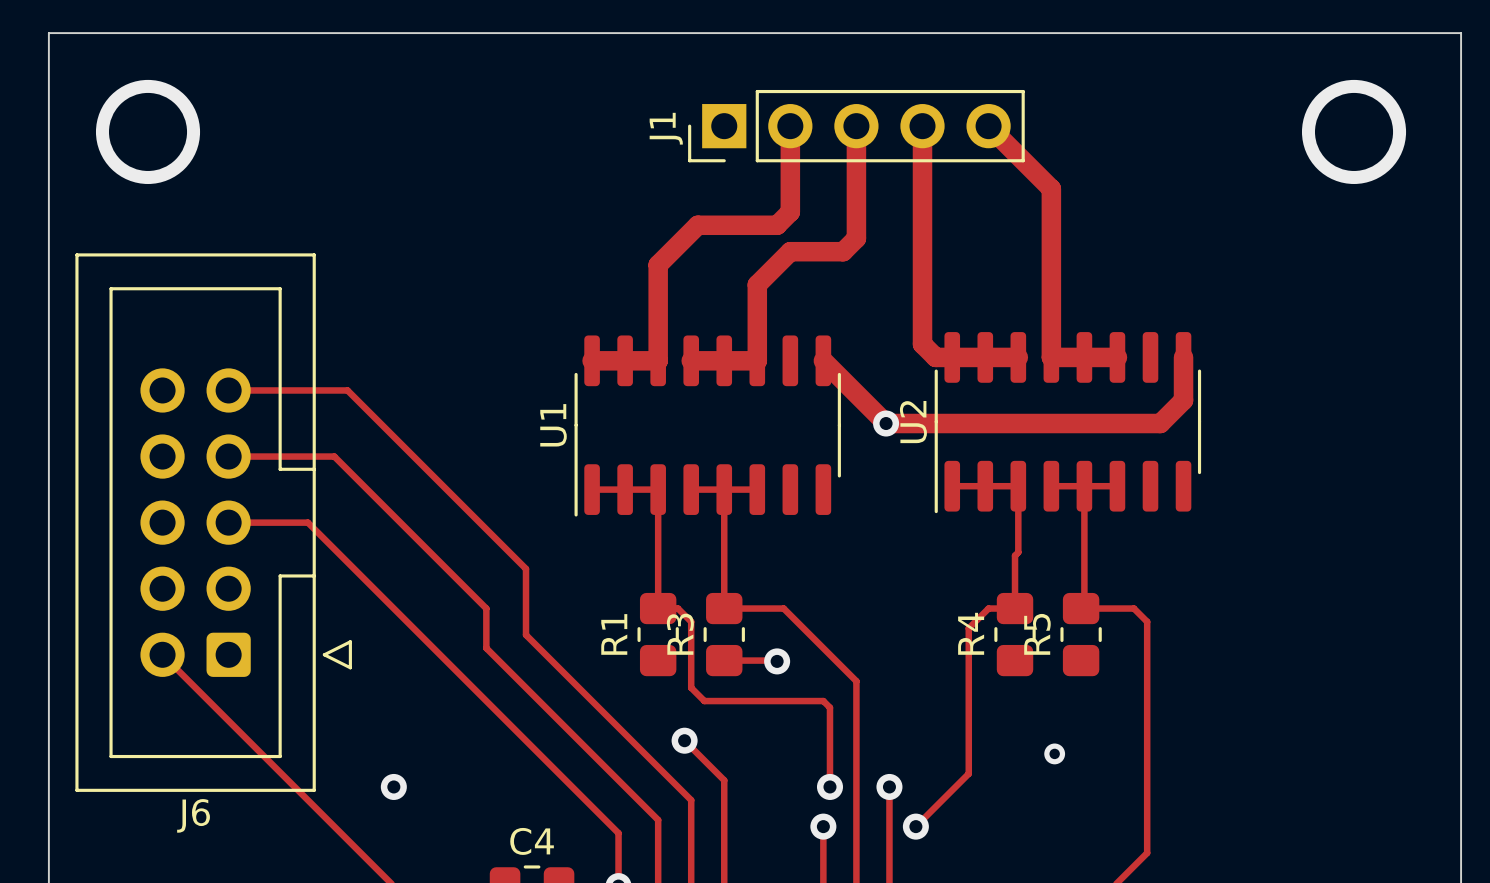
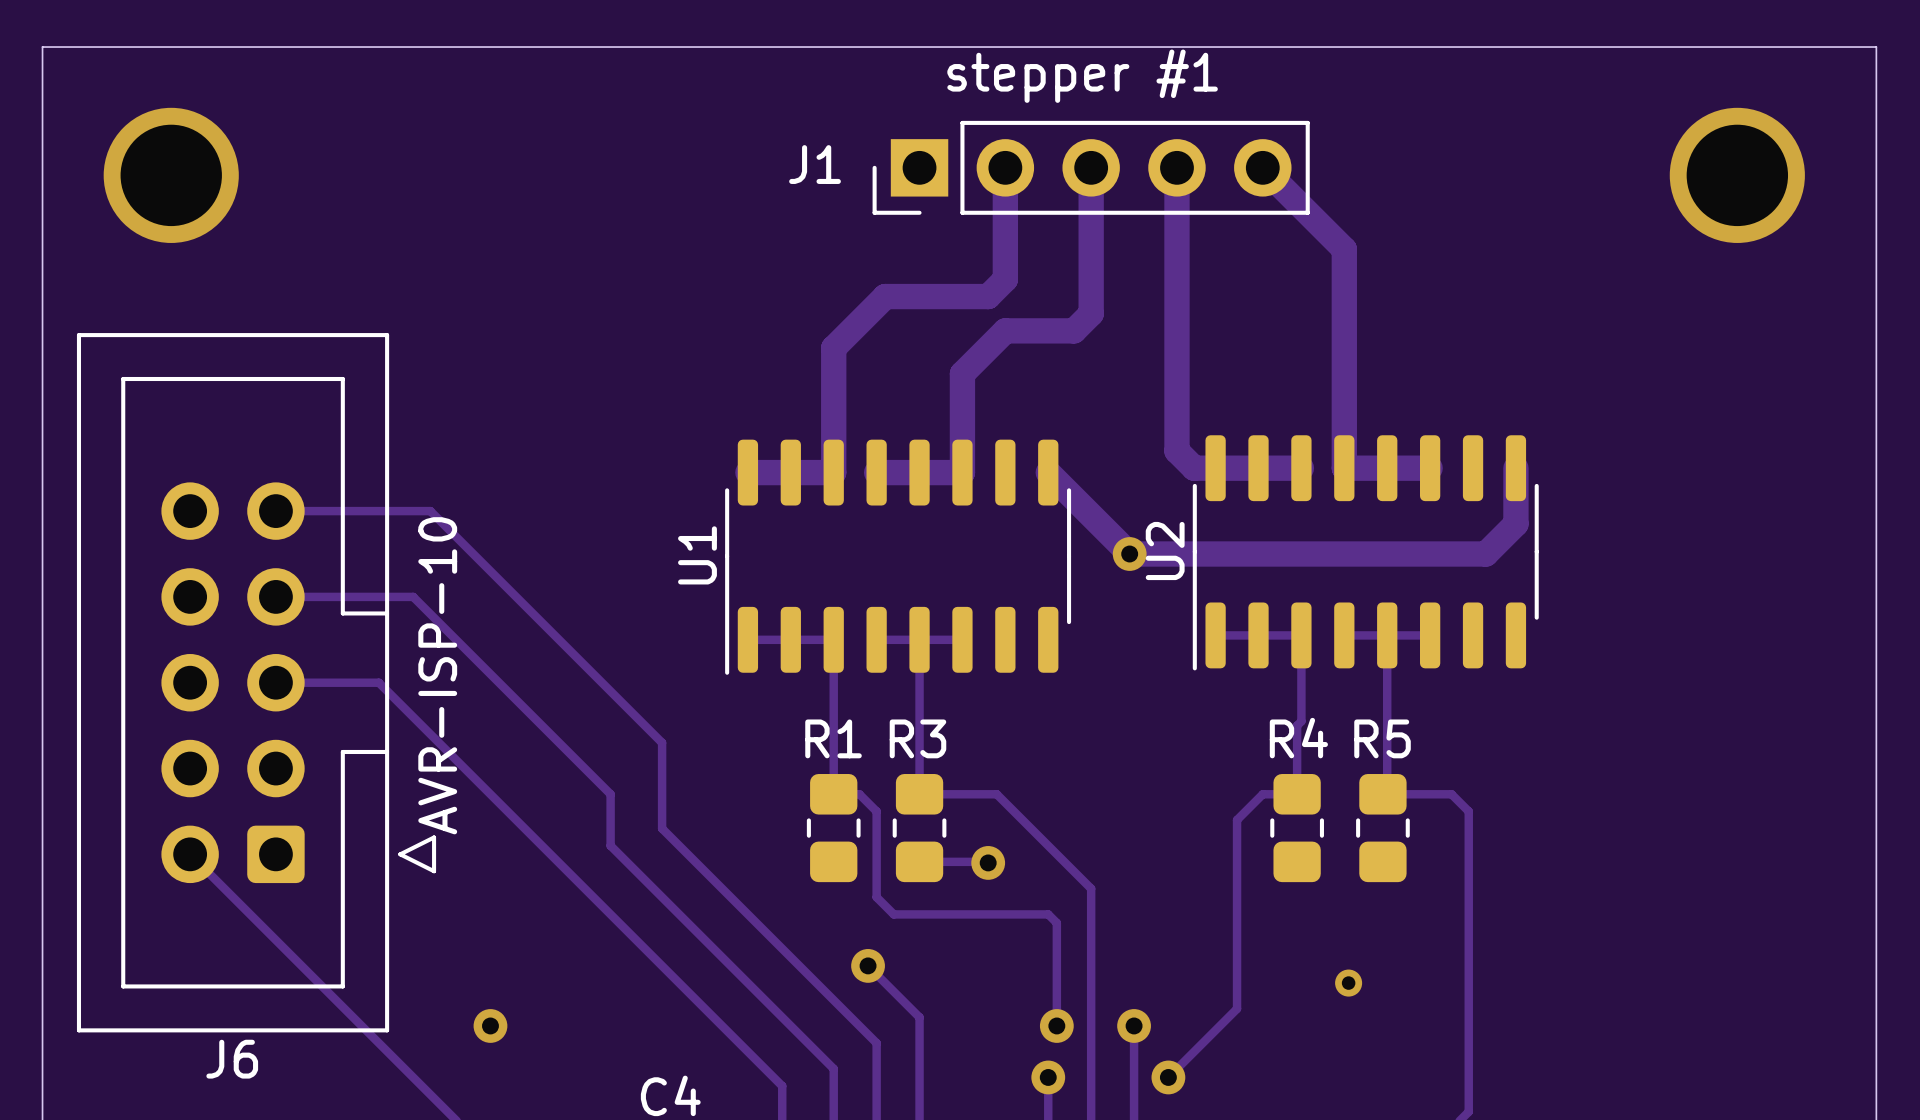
J1 value: none -> stepper #1 (1082, 76)
J1 name rotation: 0° (666, 128) -> 90° clockwise (815, 164)
J6 value: none -> AVR-ISP-10 (437, 675)
R4 name rotation: 0° (971, 633) -> 90° clockwise (1298, 738)
R4 name position: R4 (971, 633) -> R4 (1298, 738)
R1 name rotation: 0° (614, 634) -> 90° clockwise (833, 738)
R1 name position: R1 (614, 634) -> R1 (833, 738)
R3 name rotation: 0° (680, 634) -> 90° clockwise (917, 738)
R3 name position: R3 (680, 634) -> R3 (917, 738)
R5 name rotation: 0° (1037, 634) -> 90° clockwise (1382, 738)
R5 name position: R5 (1037, 634) -> R5 (1382, 738)

